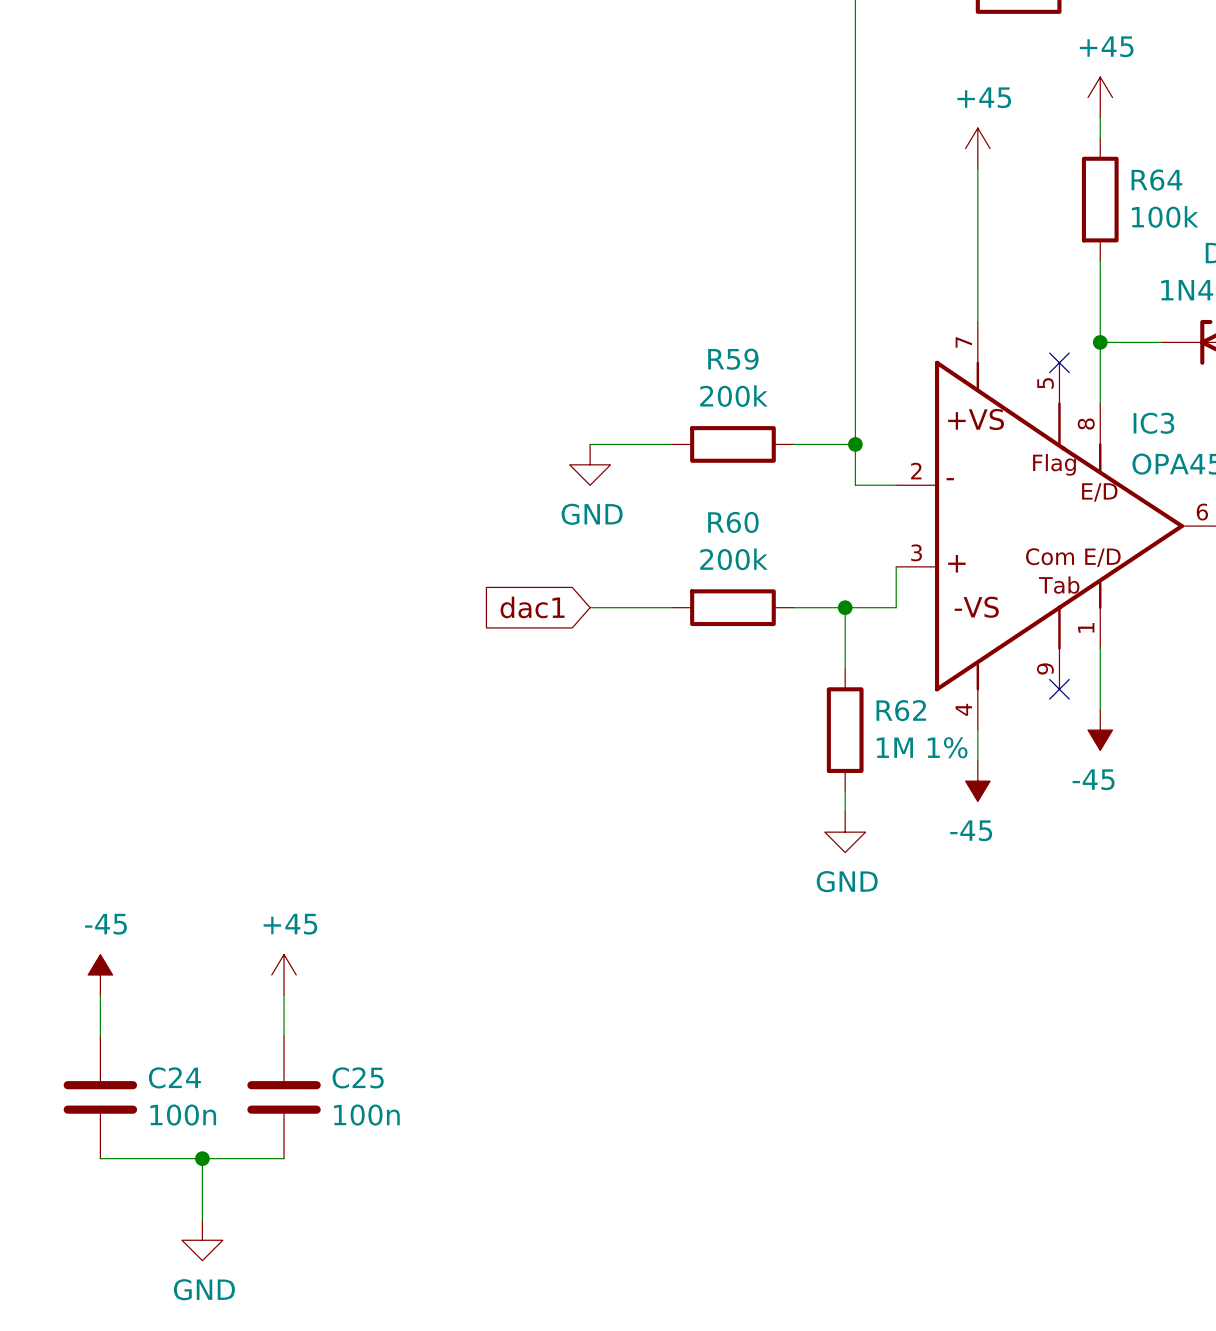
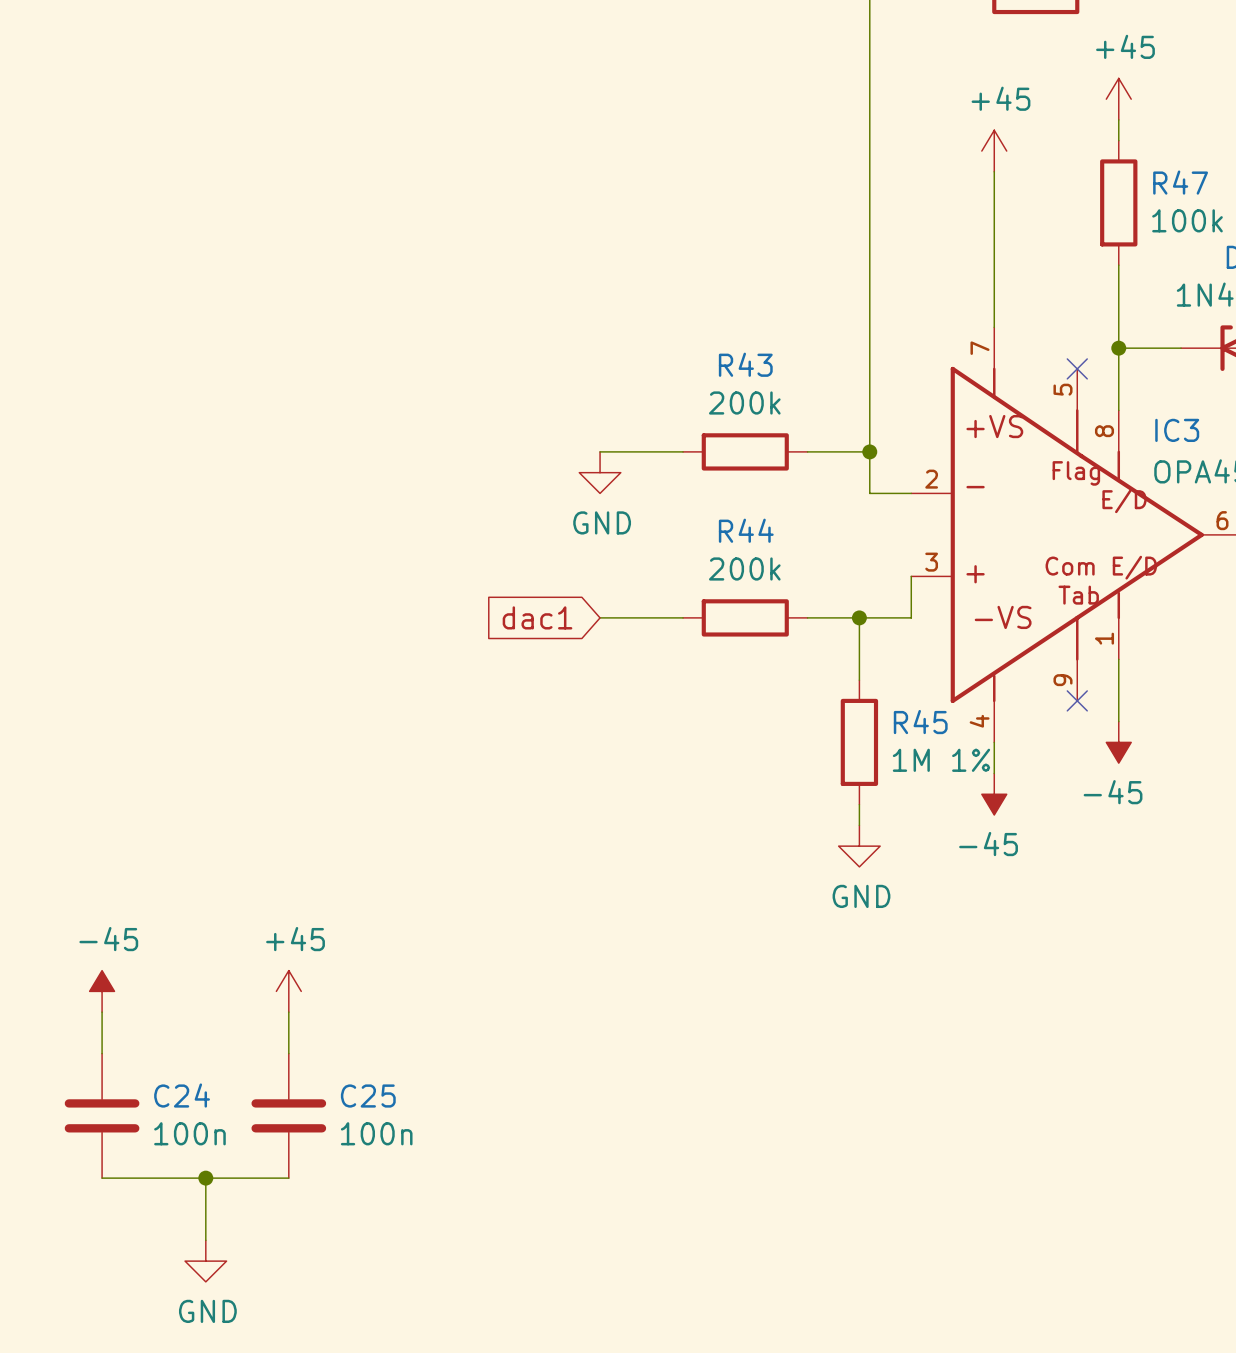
R64 name: R64 (1156, 180) -> R47 (1180, 182)
R59 name: R59 (733, 359) -> R43 (745, 364)
R60 name: R60 (733, 522) -> R44 (746, 530)
R62 name: R62 (901, 710) -> R45 (920, 722)

